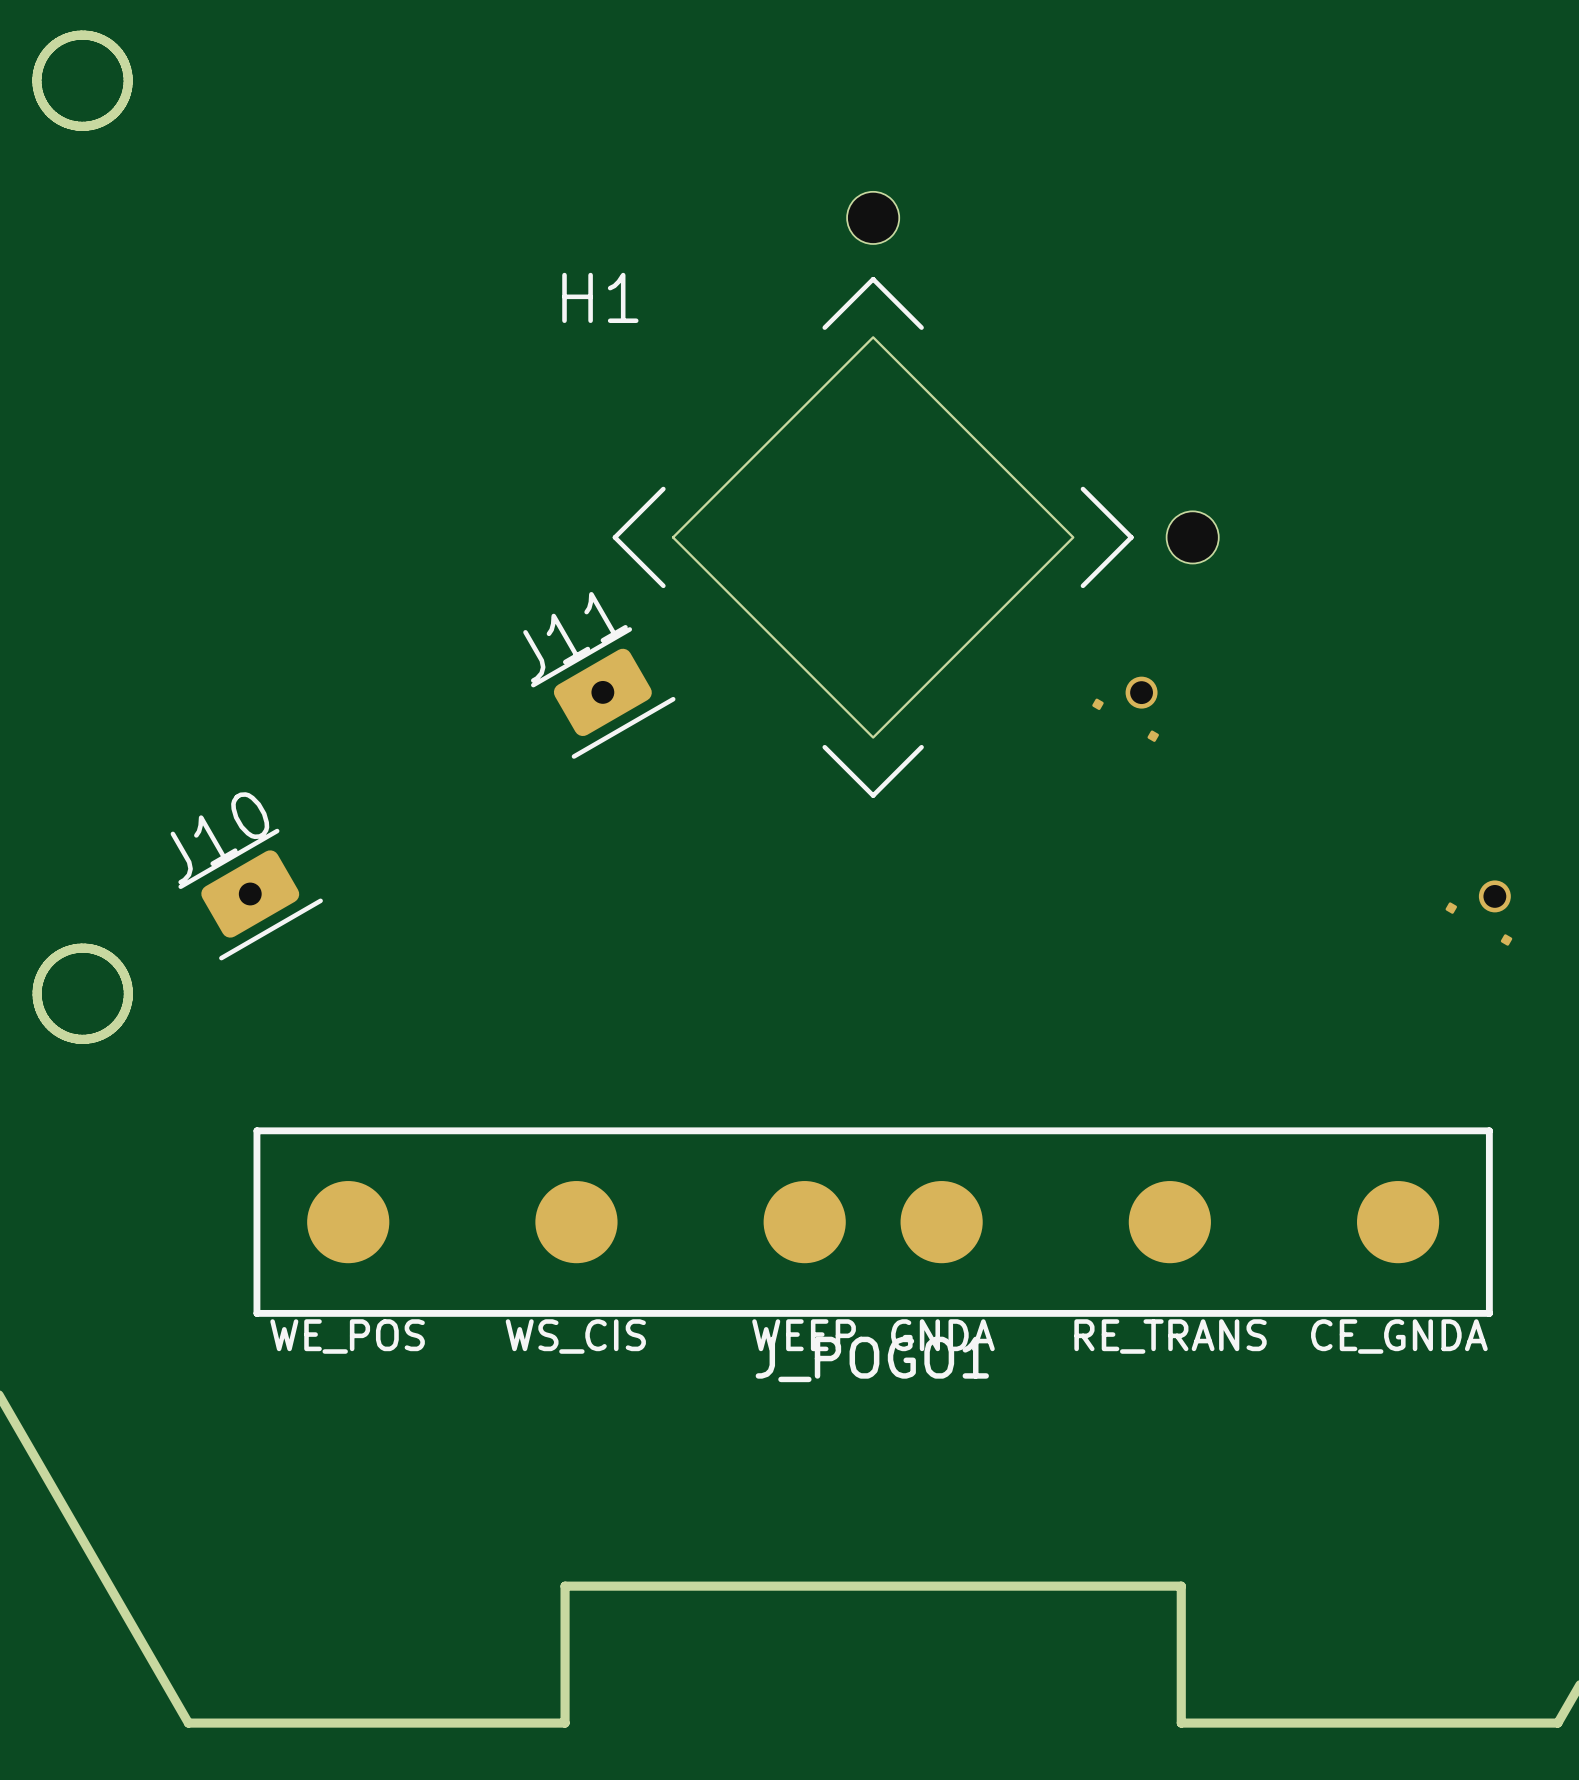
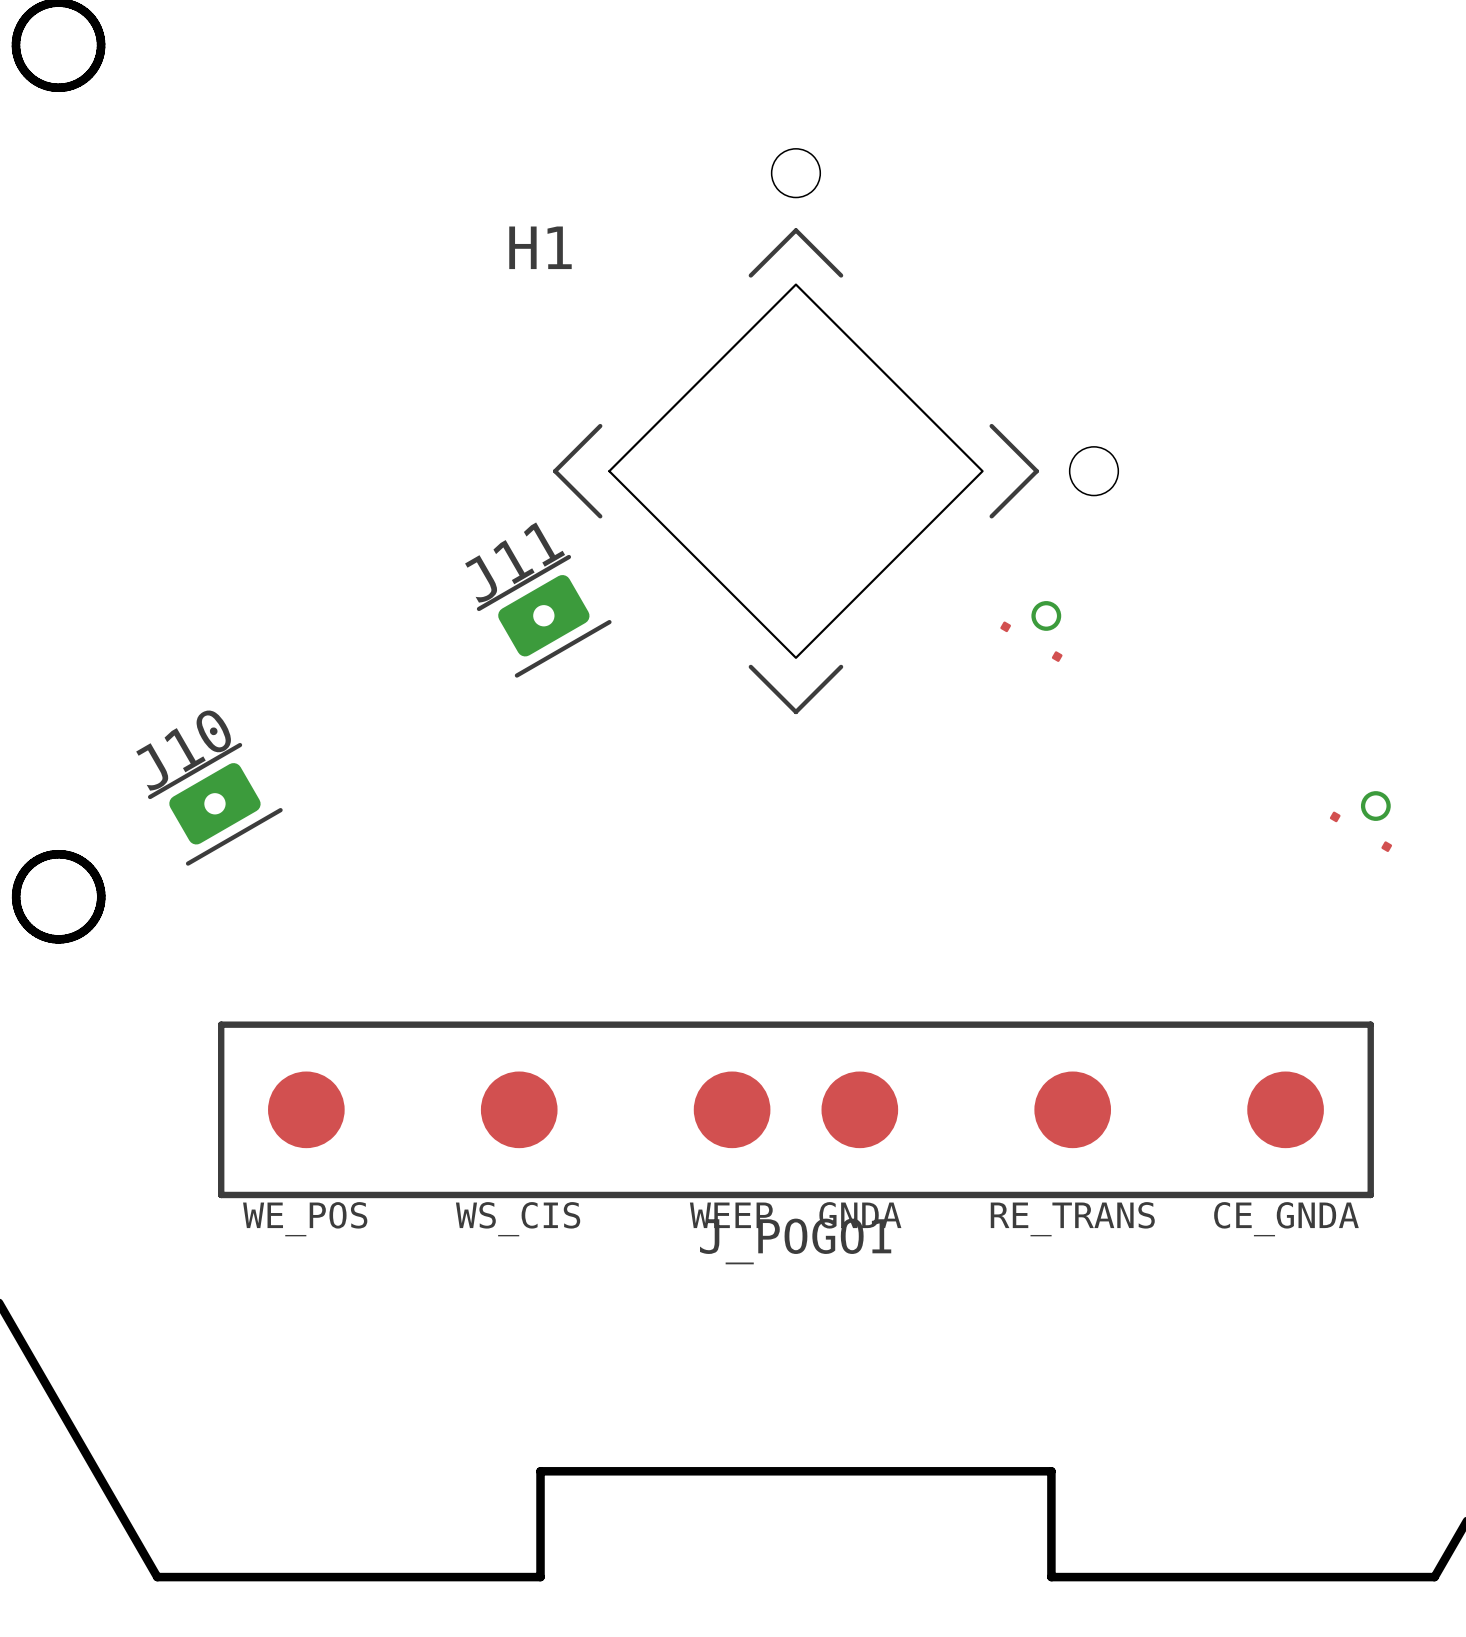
board edge: (565, 1723) (565, 1586) (1181, 1586) (1181, 1723) -> (508, 1577) (540, 1577) (540, 1471) (1051, 1471) (1051, 1577) (1083, 1577)

